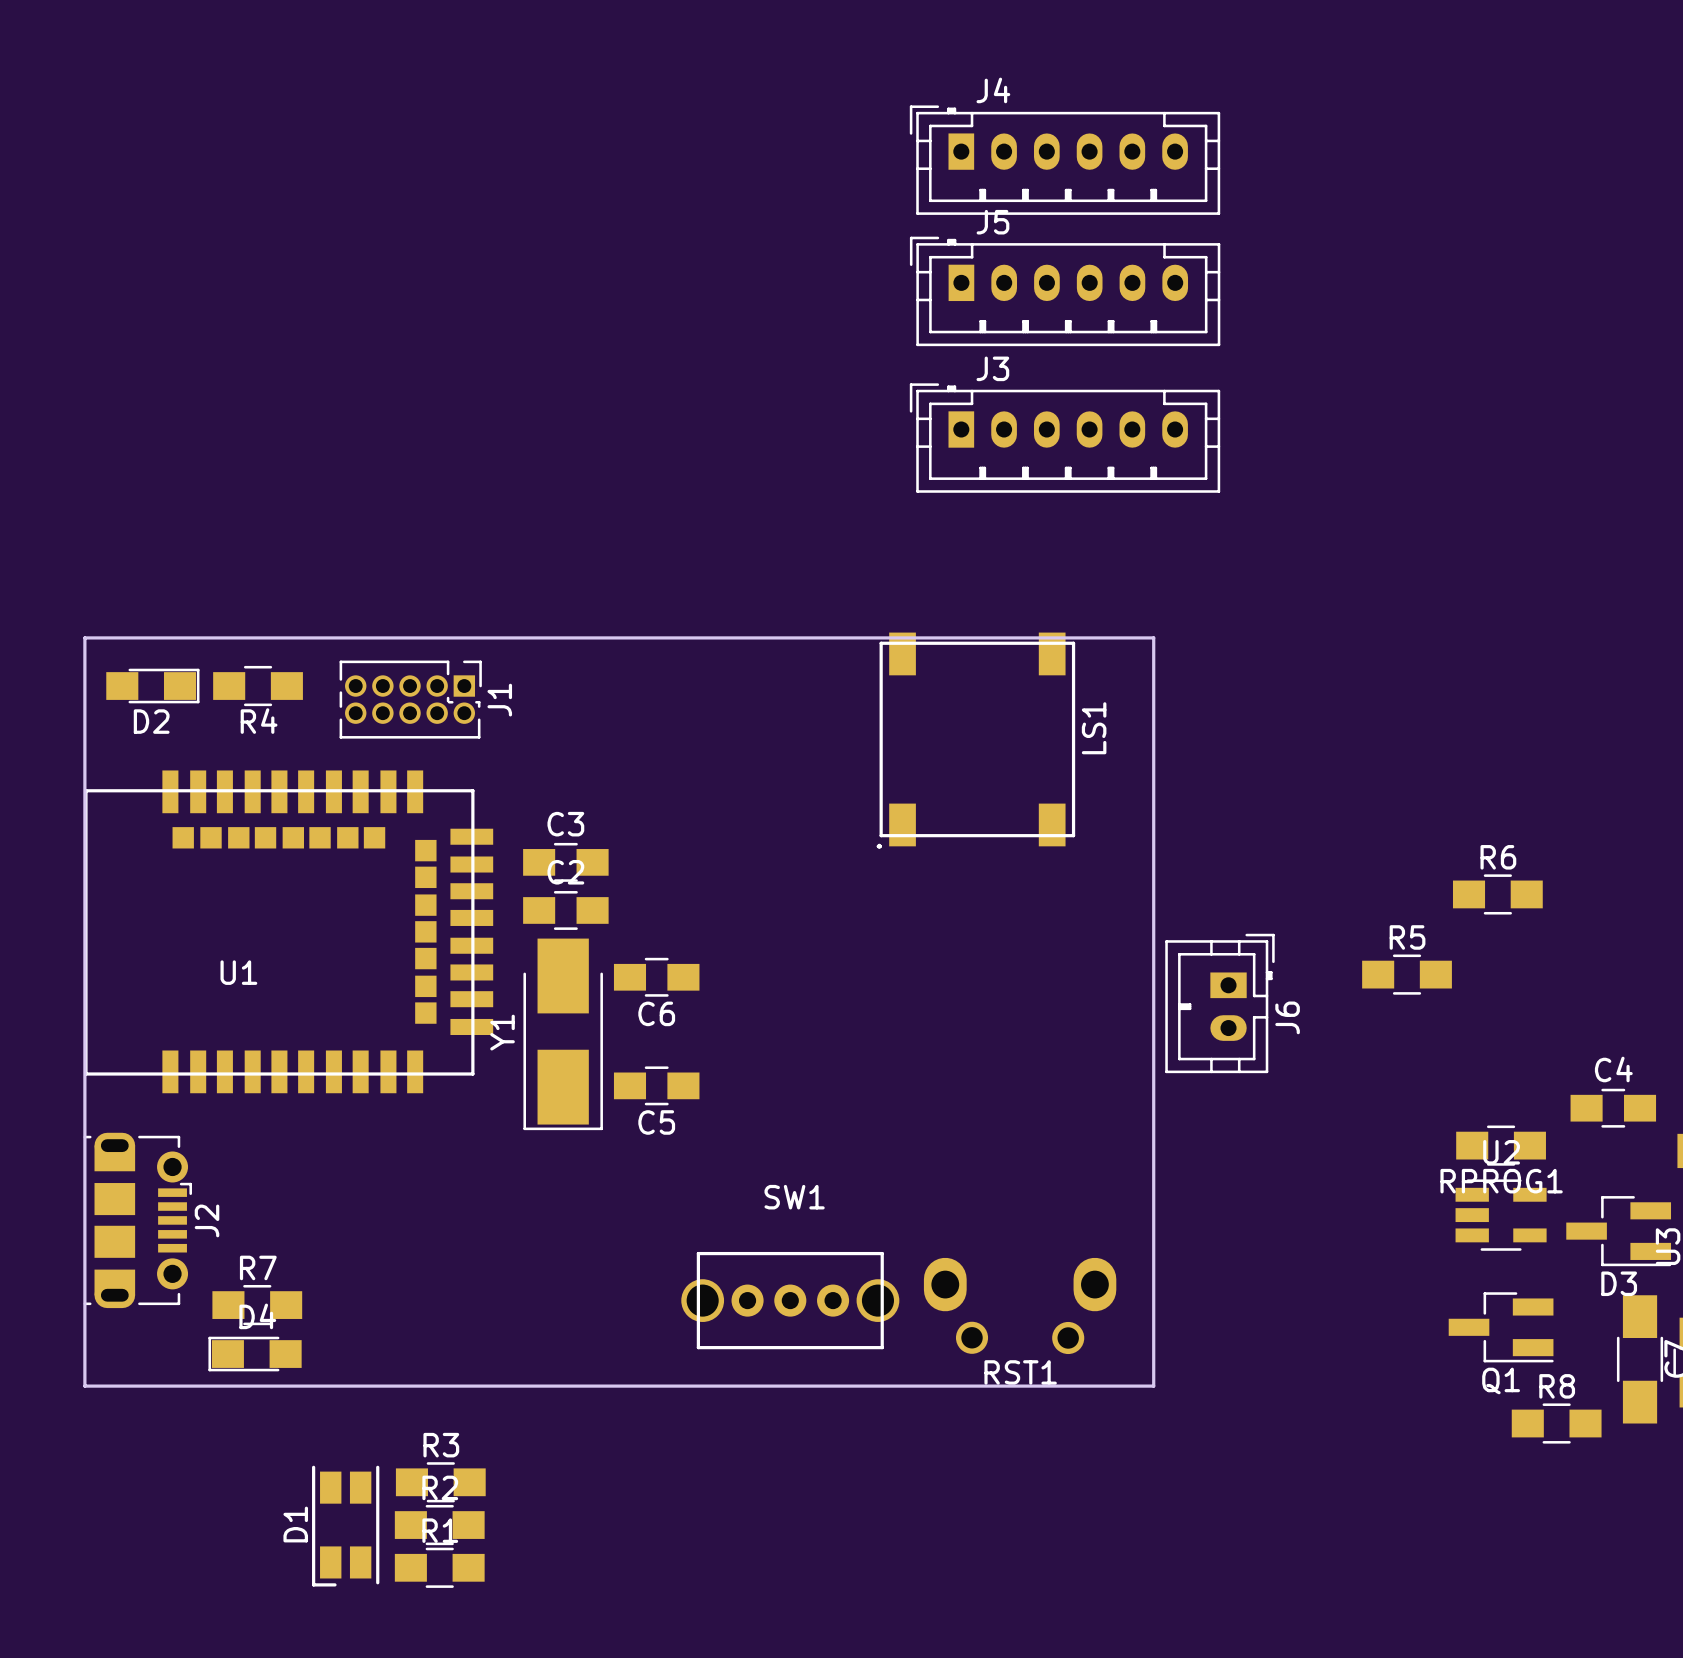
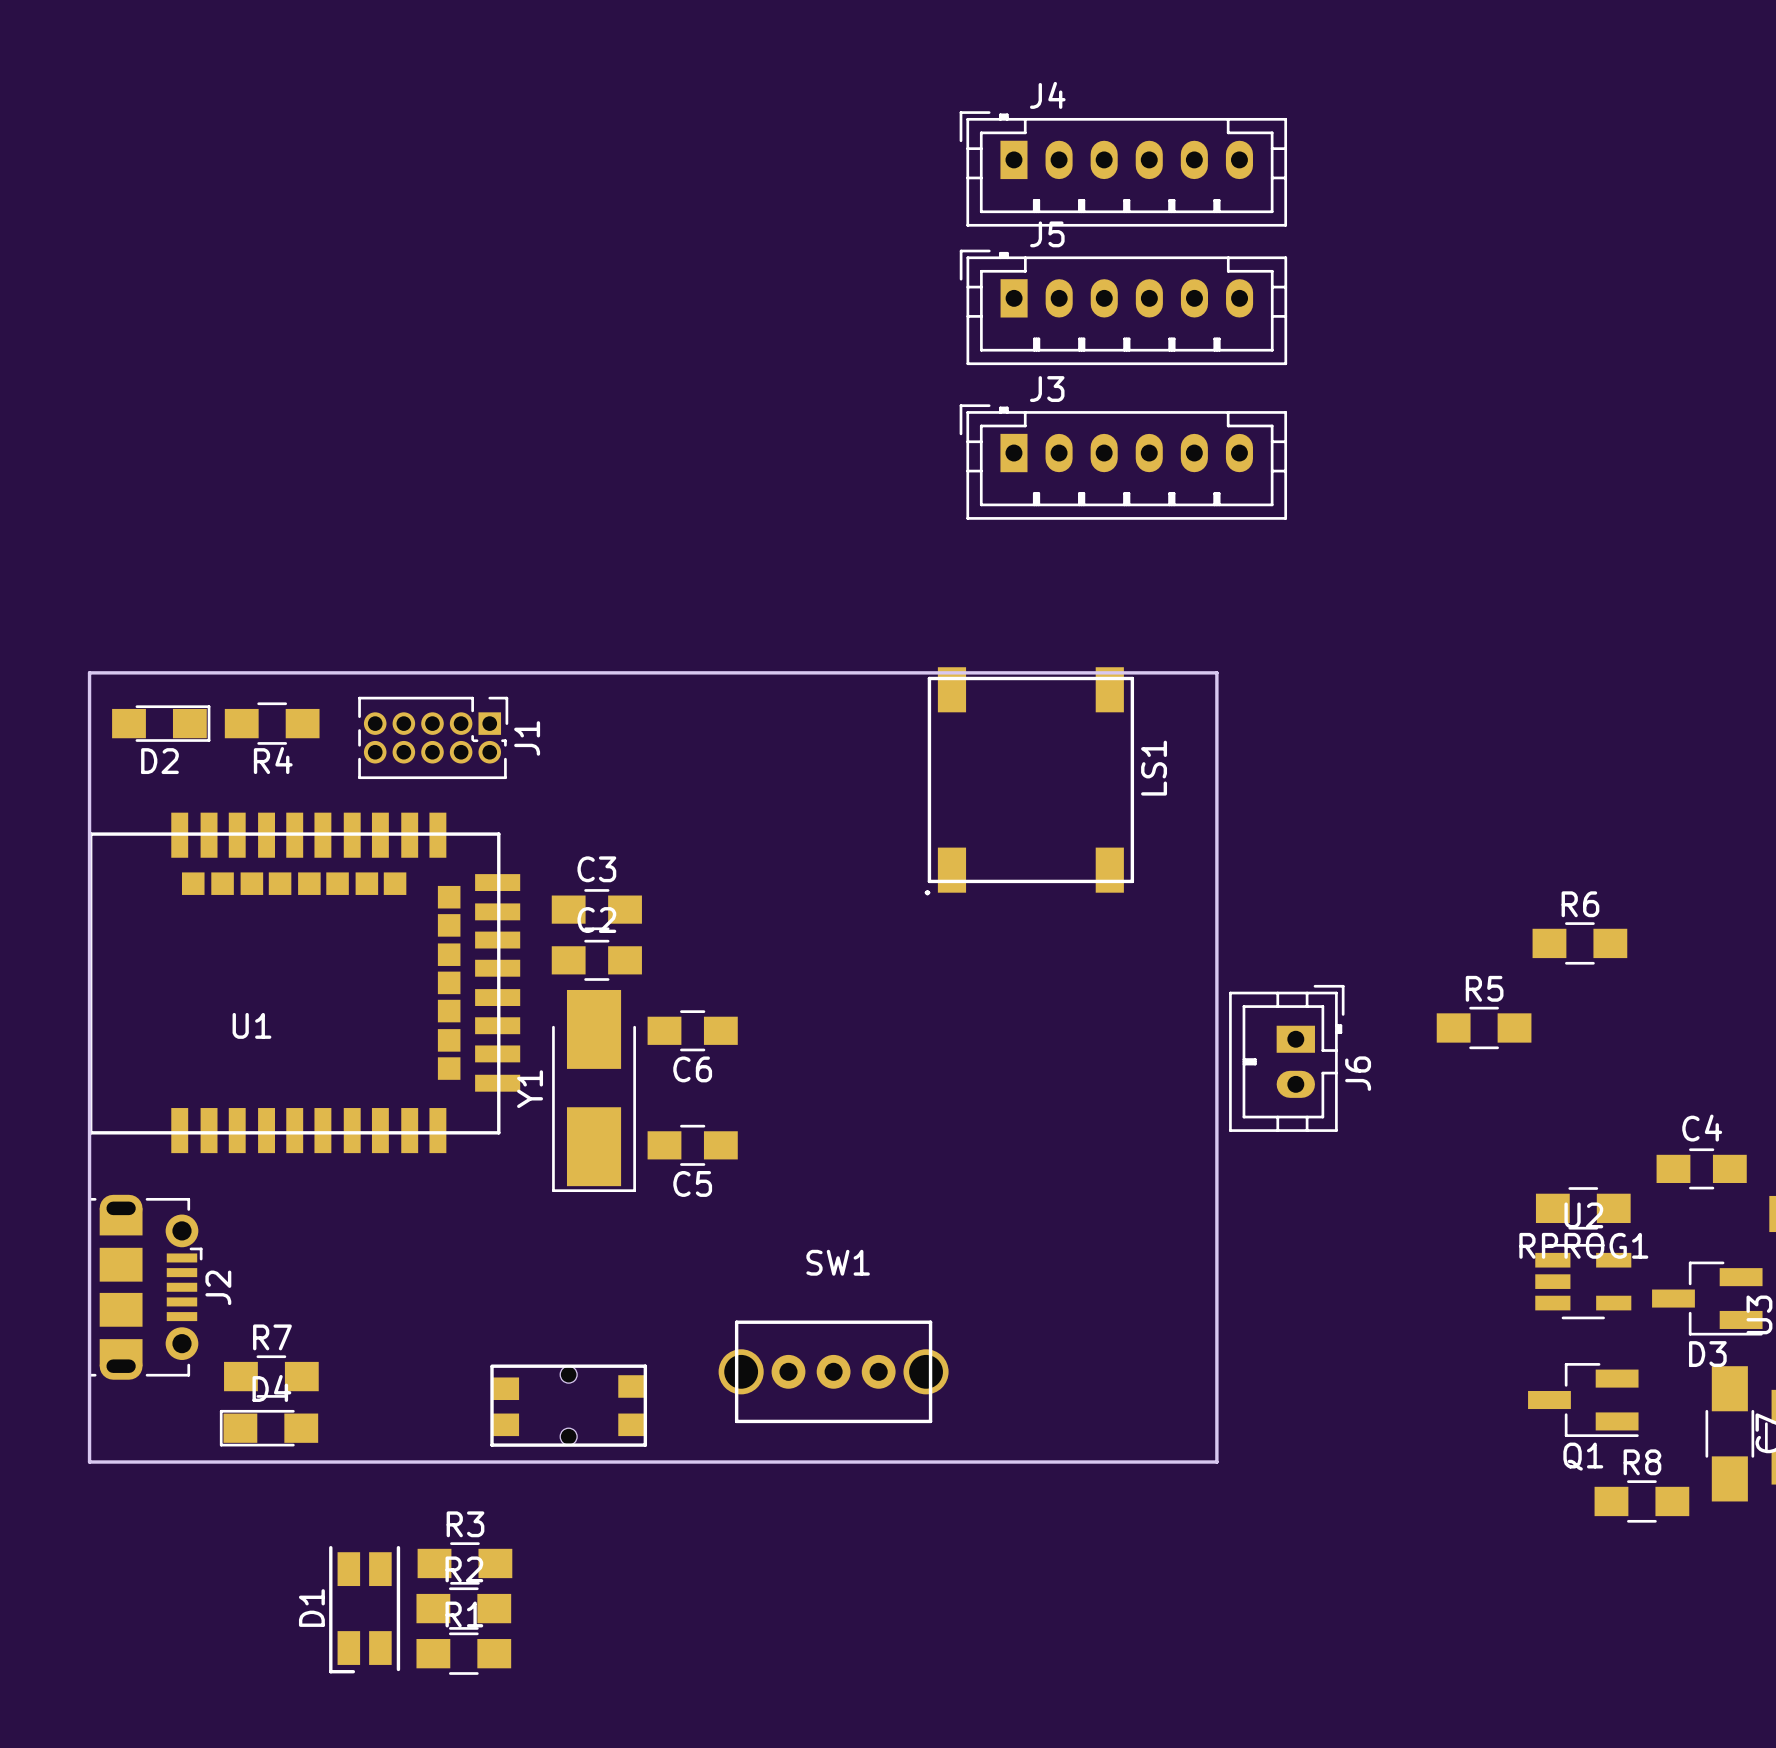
RST1: (1020, 1305) -> none
part: none -> (568, 1405)

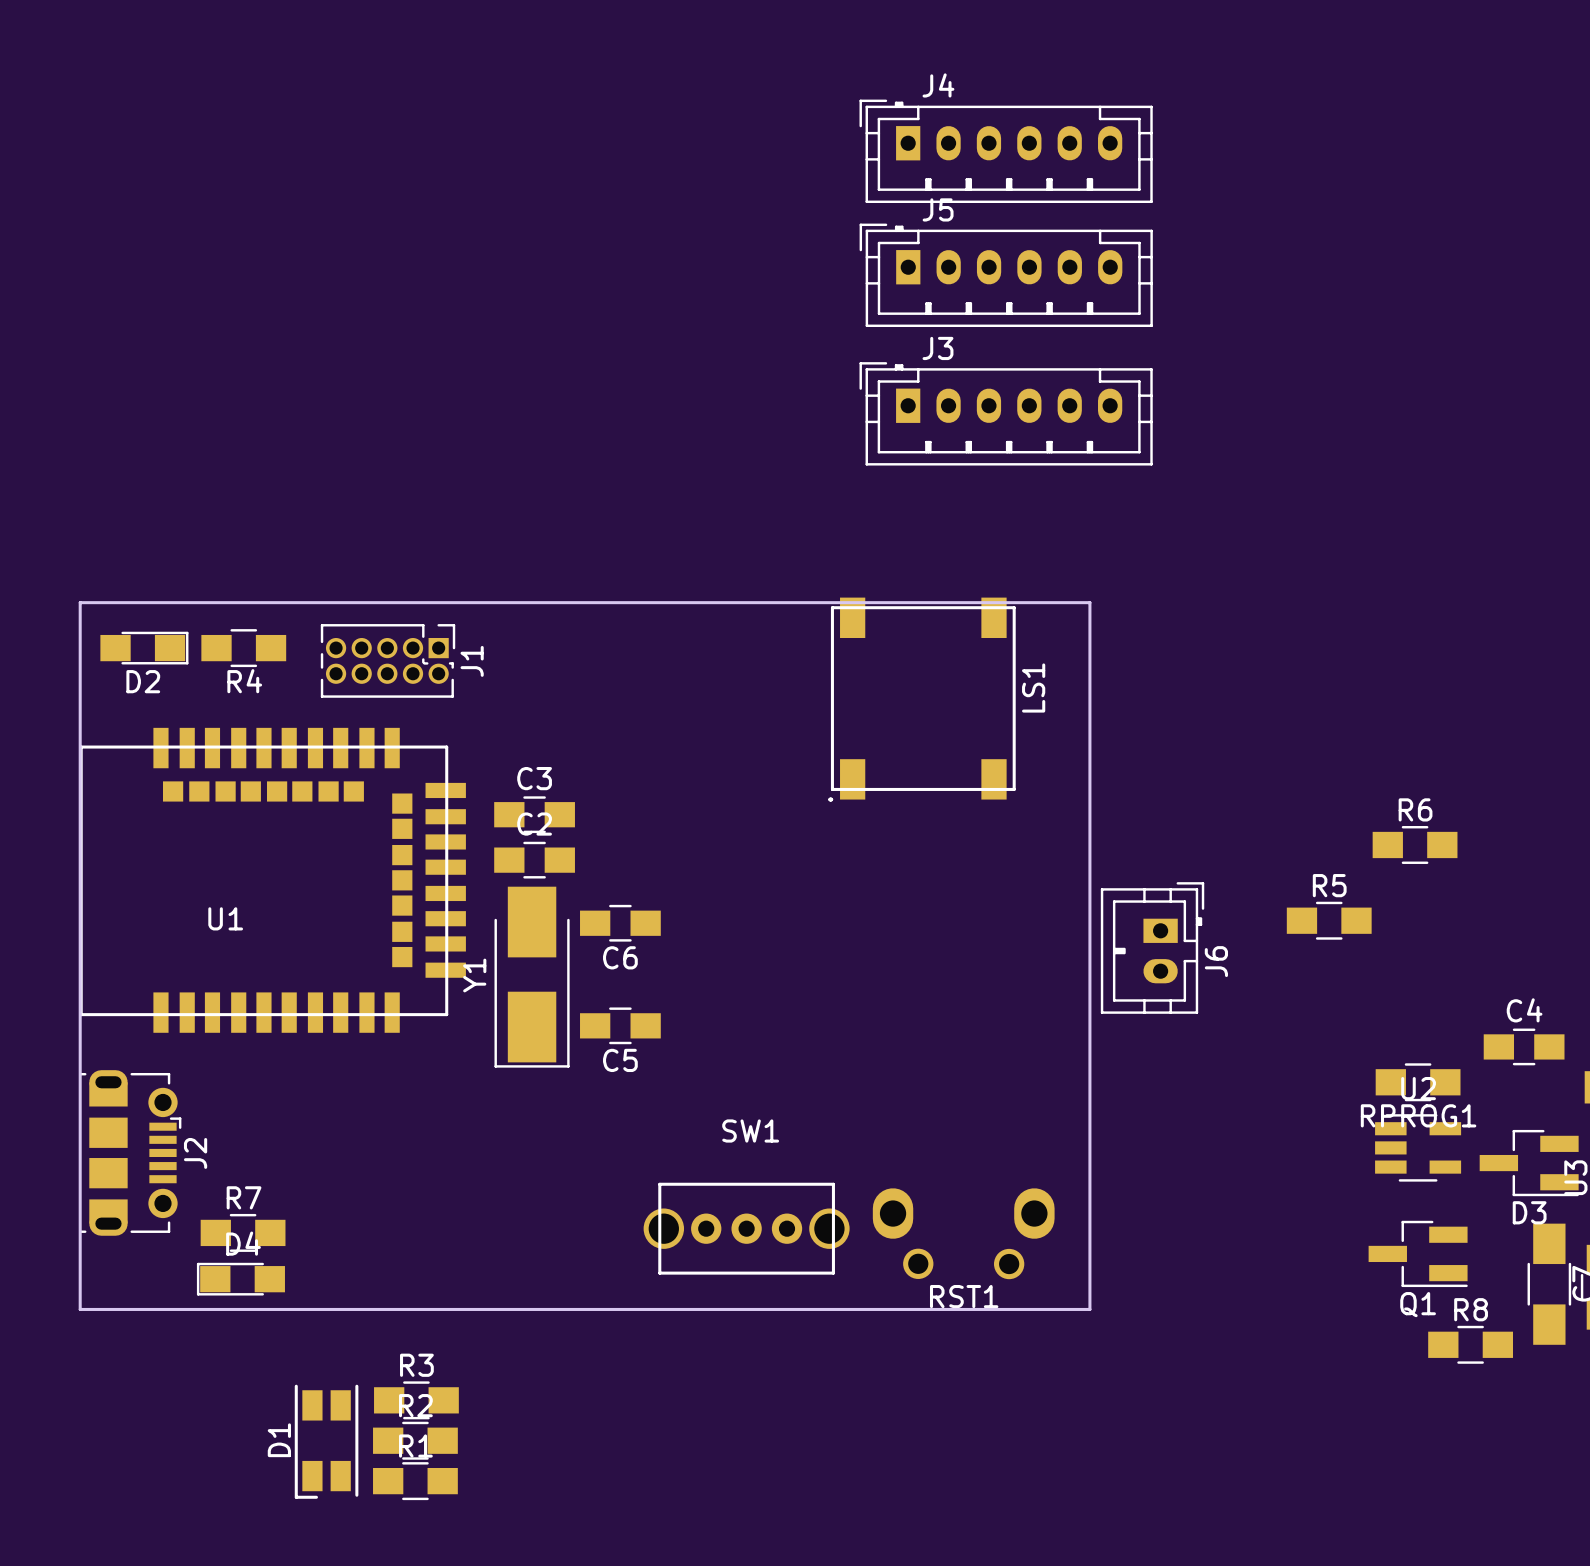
RST1: none -> (963, 1233)
part: (568, 1405) -> none

